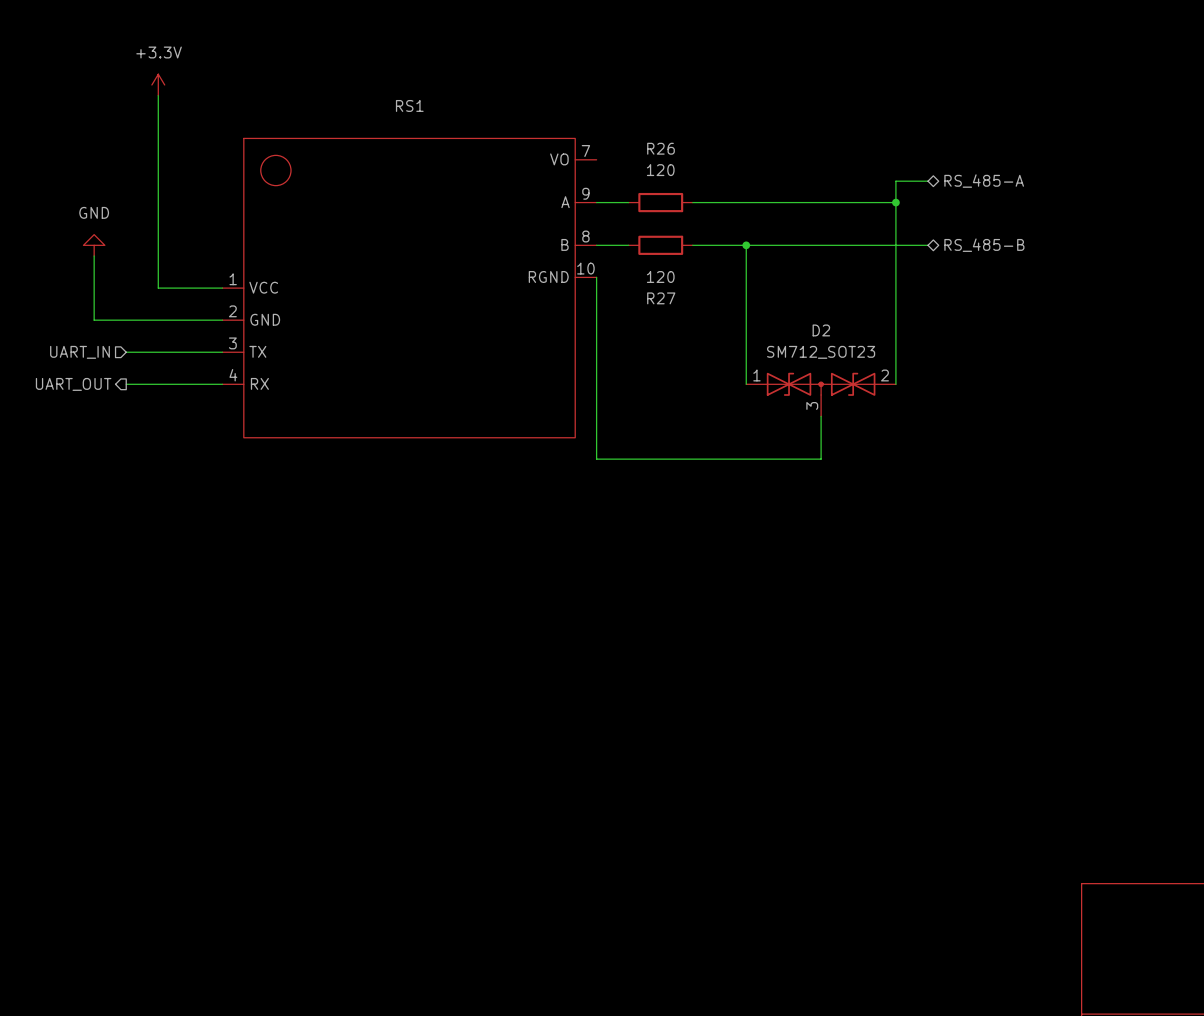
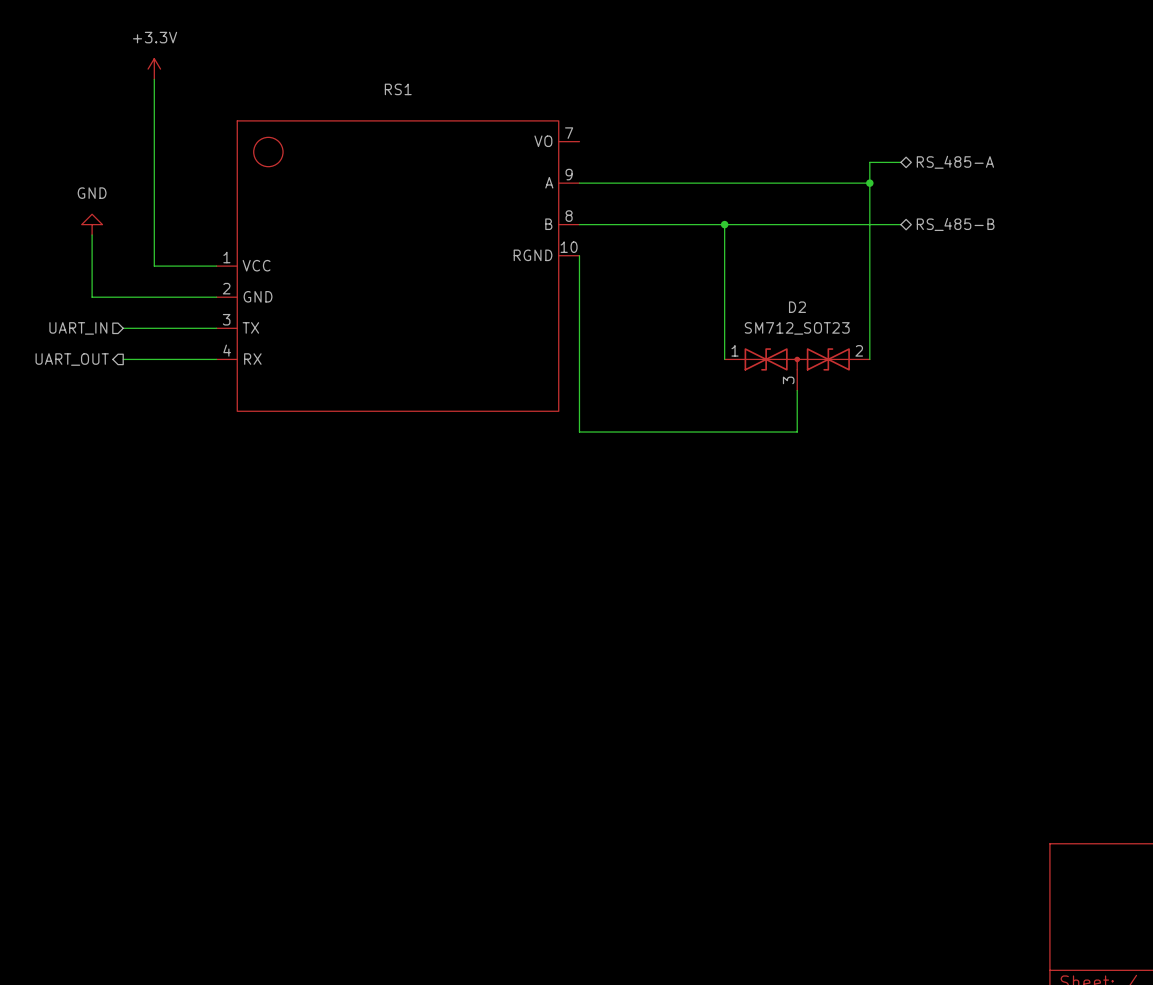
wire: none -> (610, 183) (672, 183)
R26: 120 (660, 202) -> none
wire: none -> (610, 224) (672, 224)
R27: 120 (660, 245) -> none

